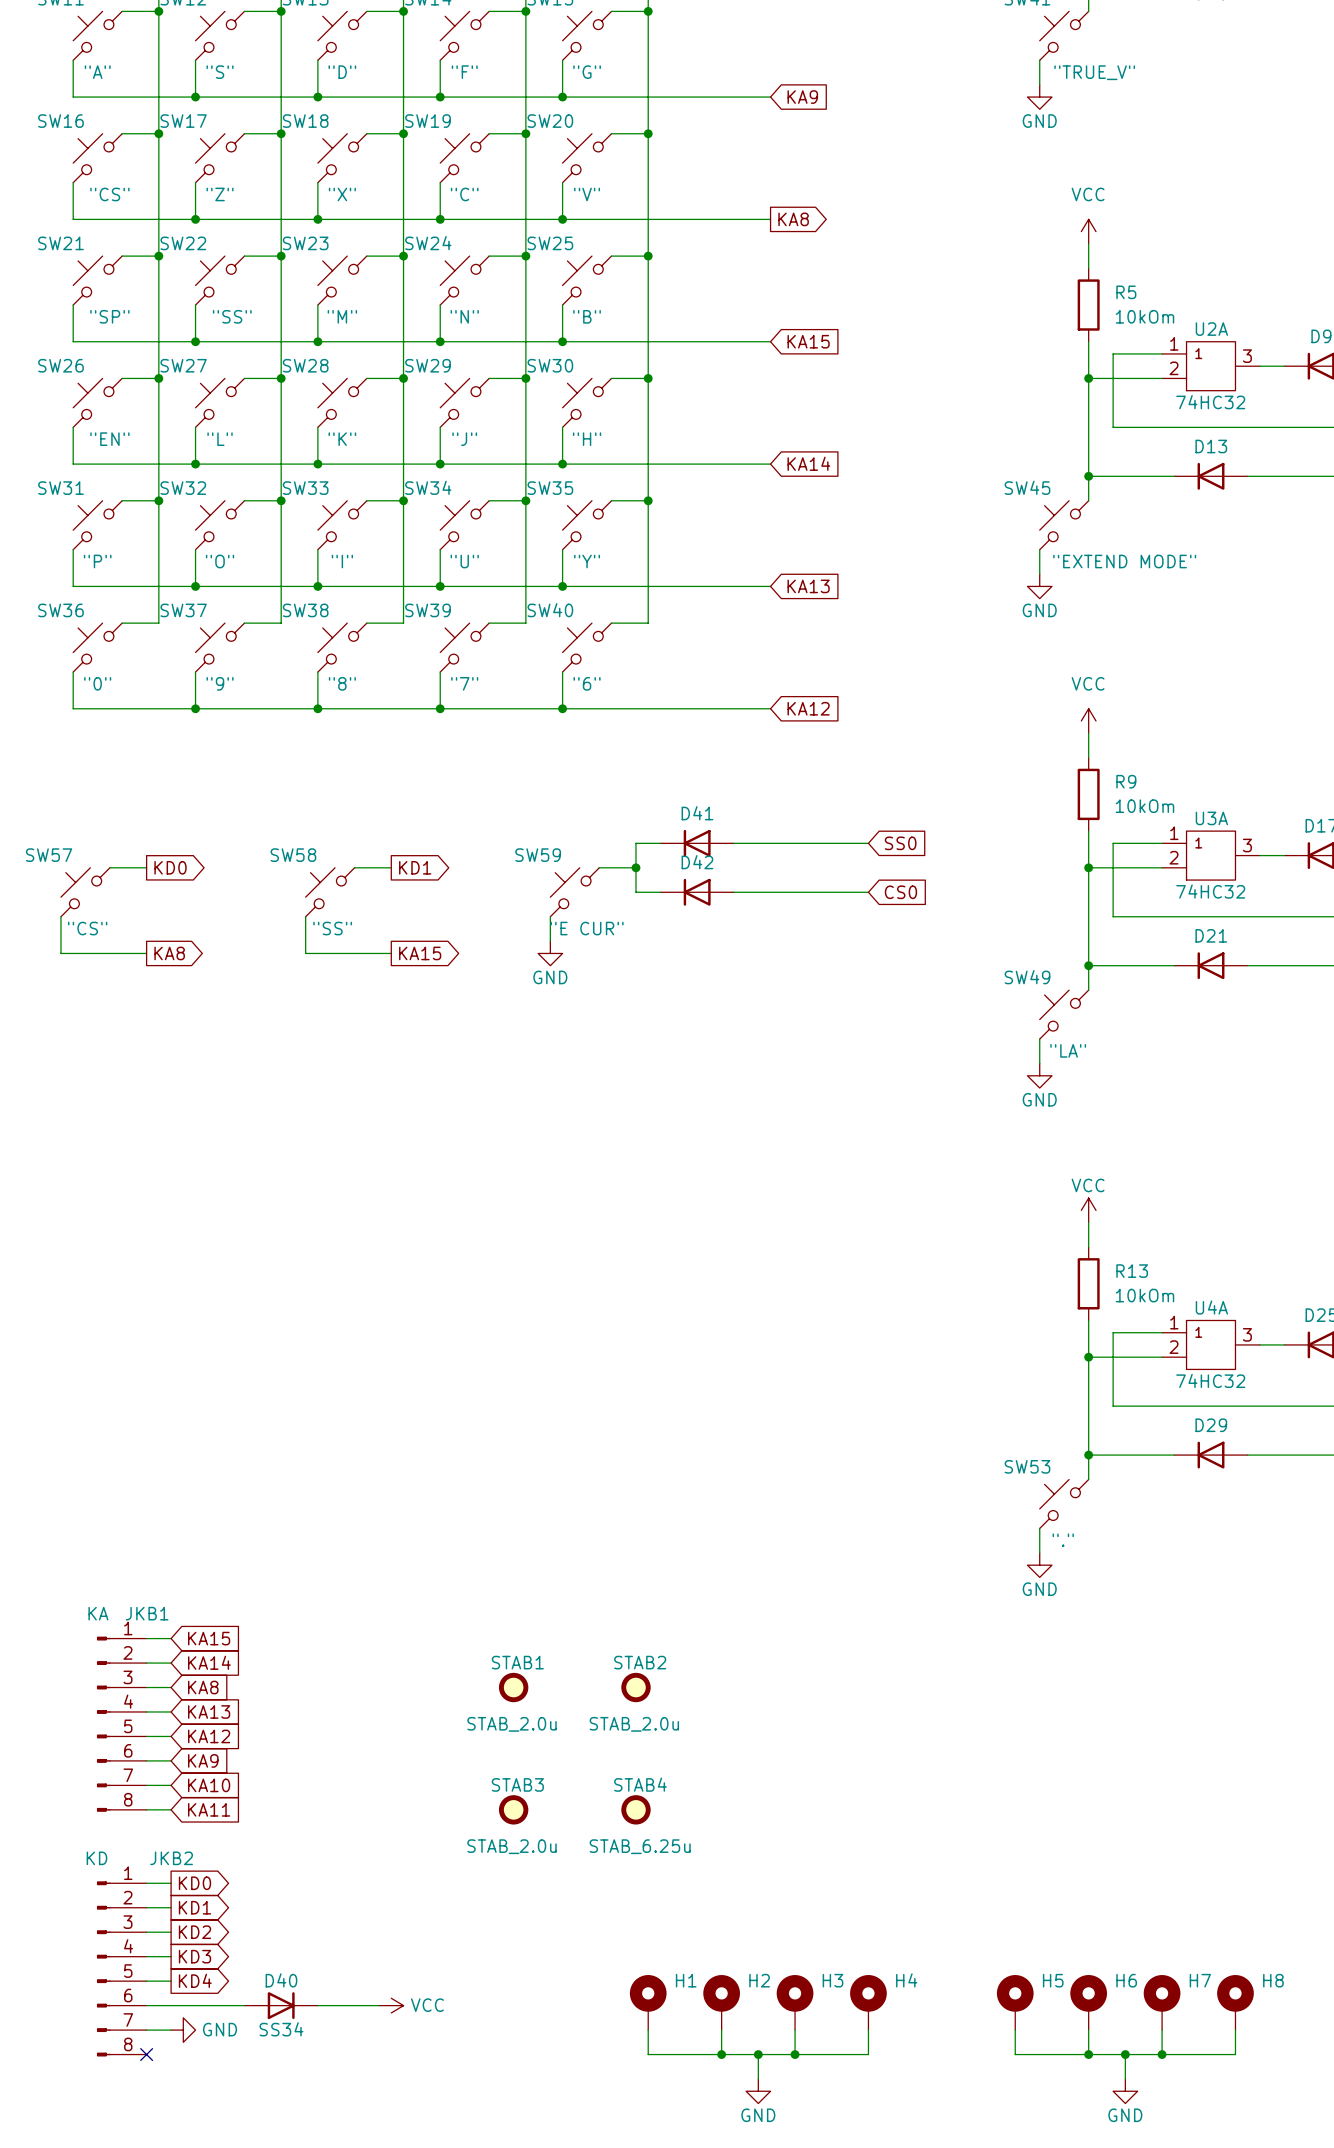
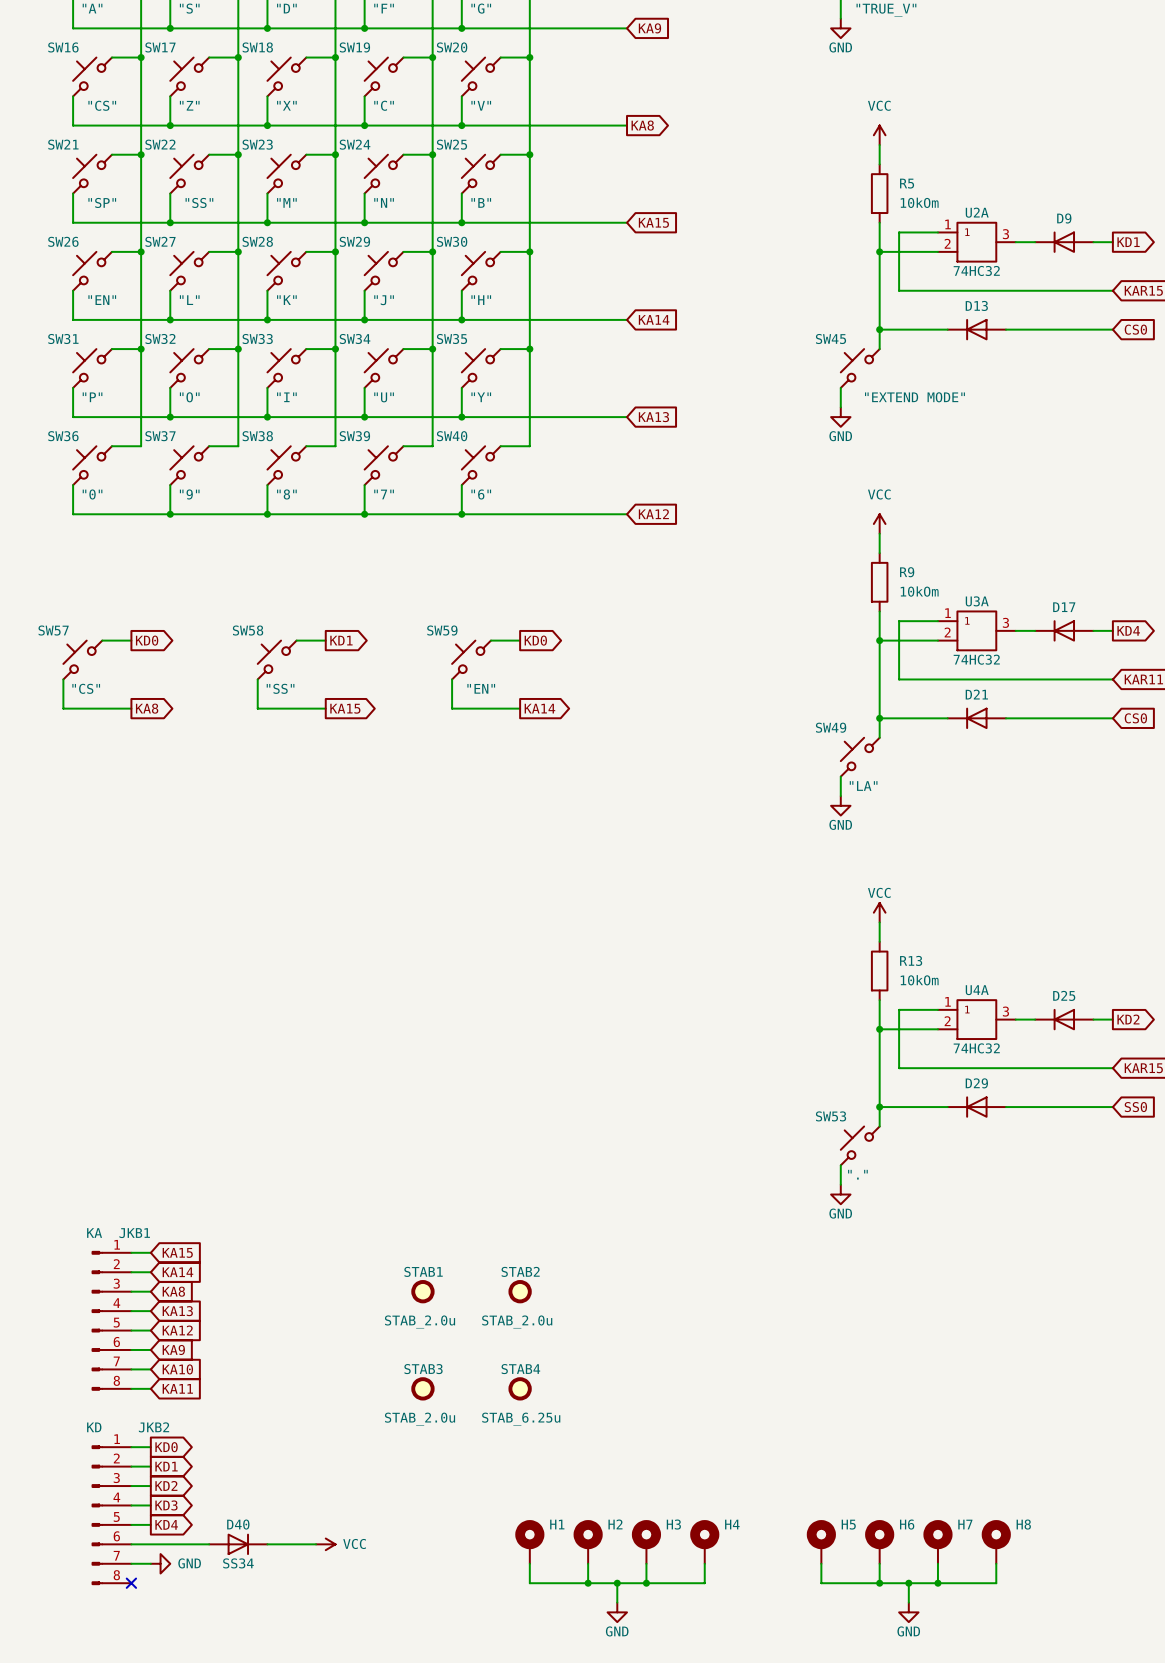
wire: (660, 843) (635, 843) (635, 892) (660, 892) -> none
D41: (697, 843) -> none
wire: (733, 843) (868, 843) -> none
global label: SS0 (900, 843) -> none
junction: (635, 867) -> none
global label: none -> KD0 (535, 640)
D42: (697, 892) -> none
wire: (733, 892) (868, 892) -> none
global label: CS0 (900, 892) -> none
SW59 text: "E CUR" (587, 928) -> "EN" (481, 688)
wire: none -> (452, 698) (452, 708) (520, 708)
power symbol: GND (550, 953) -> none
global label: none -> KA14 (539, 708)

